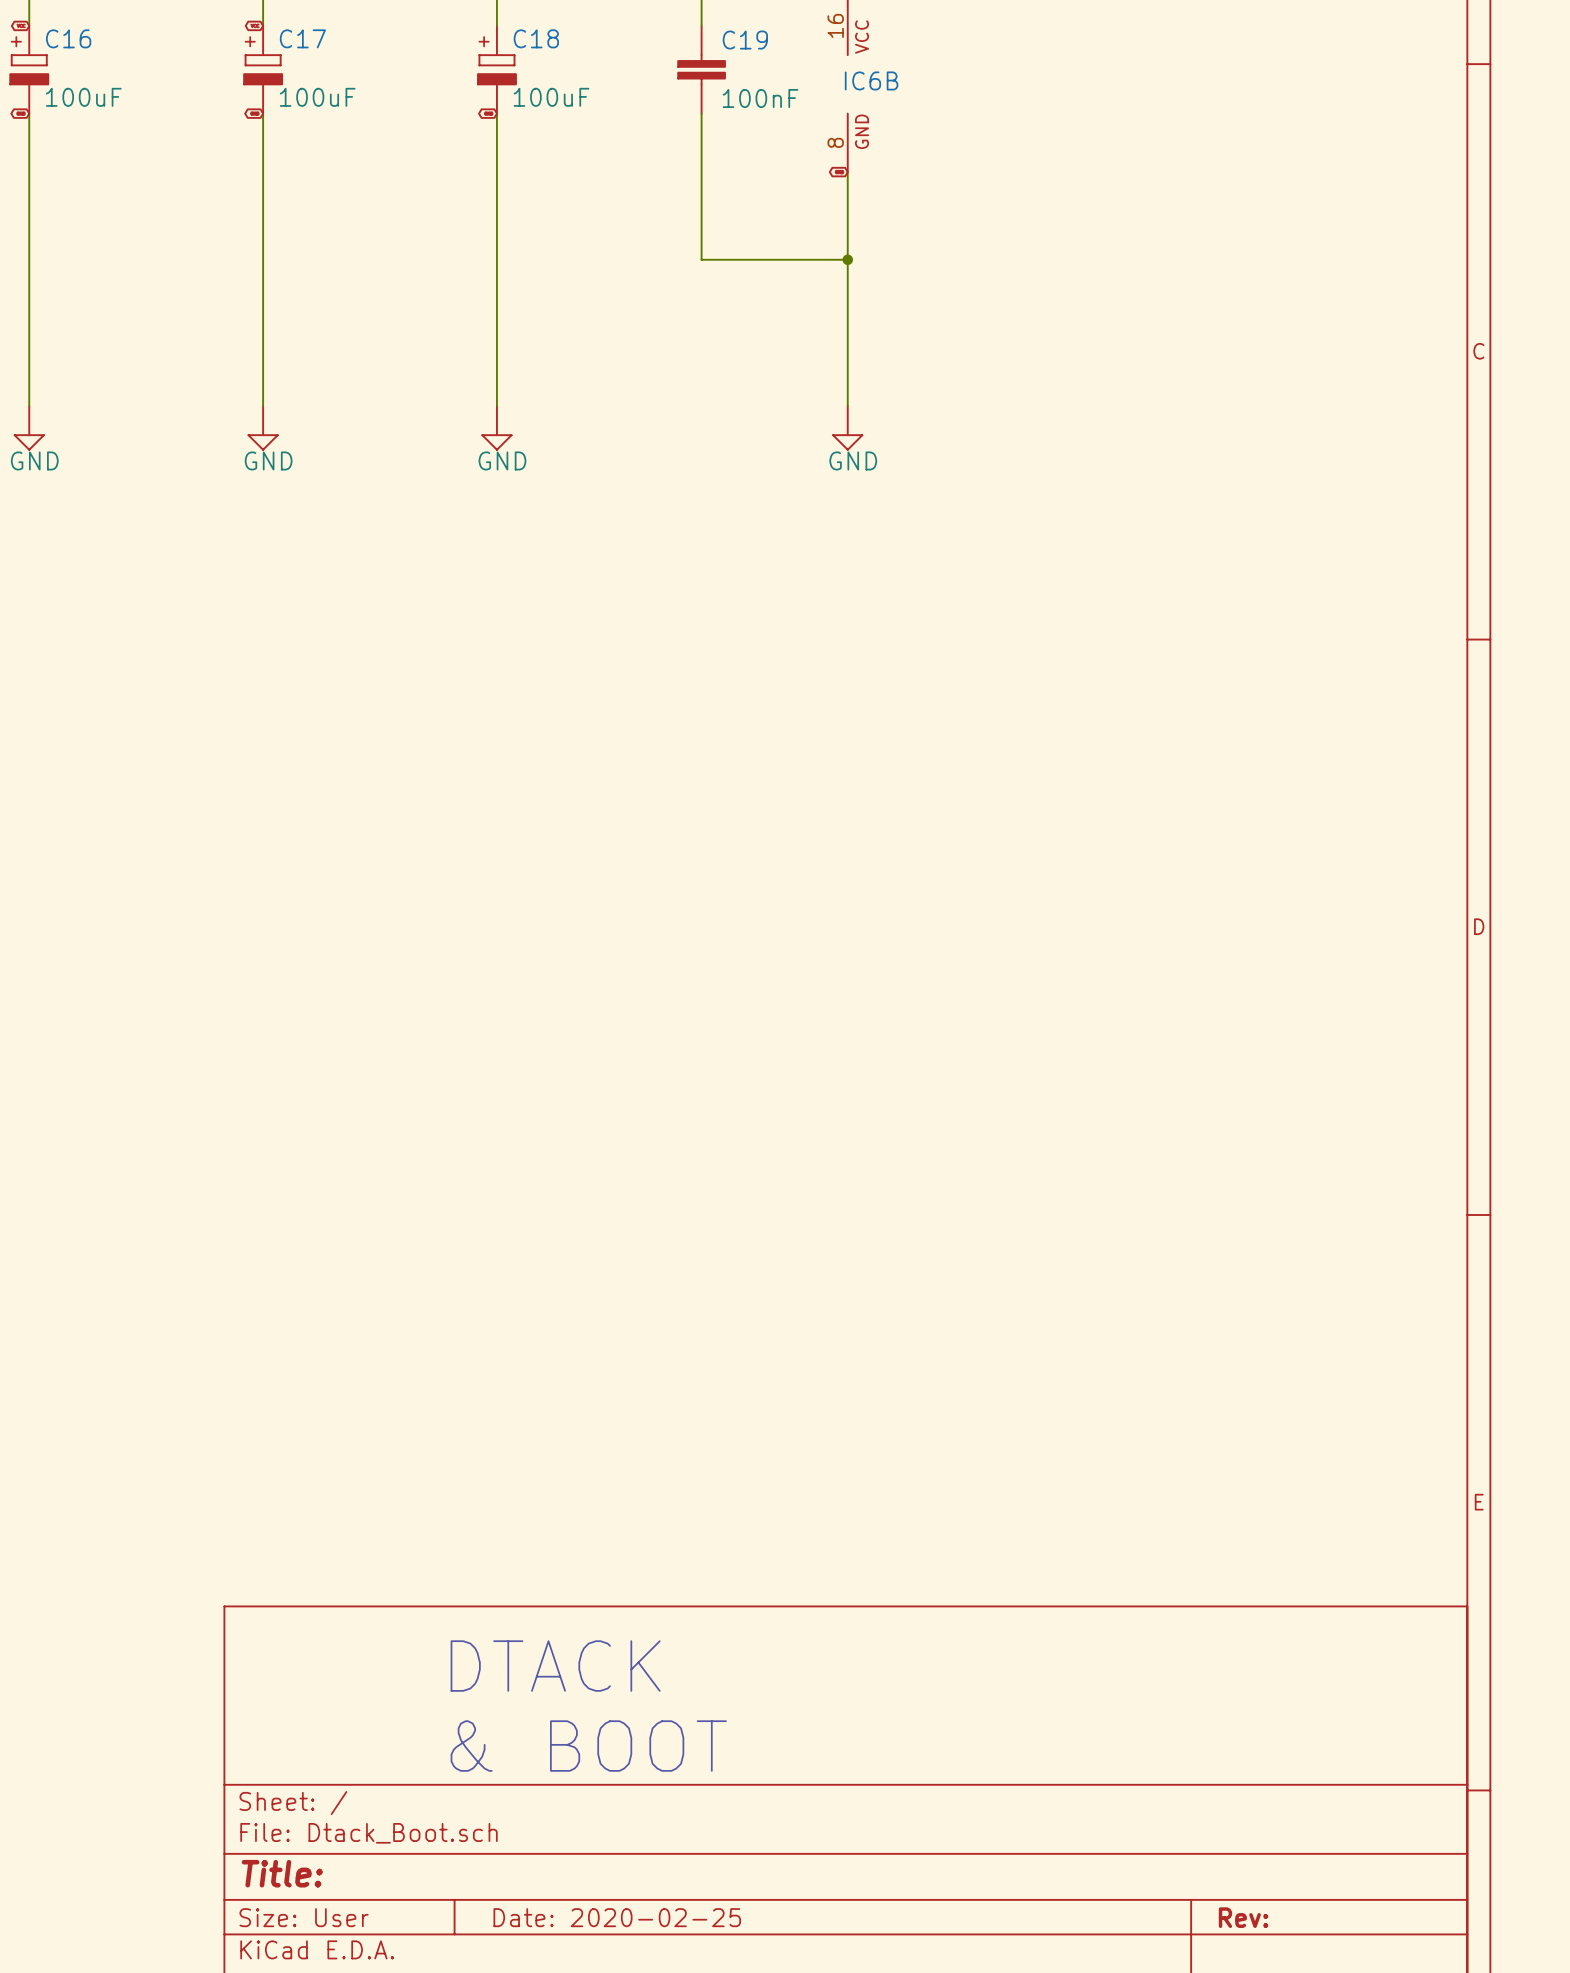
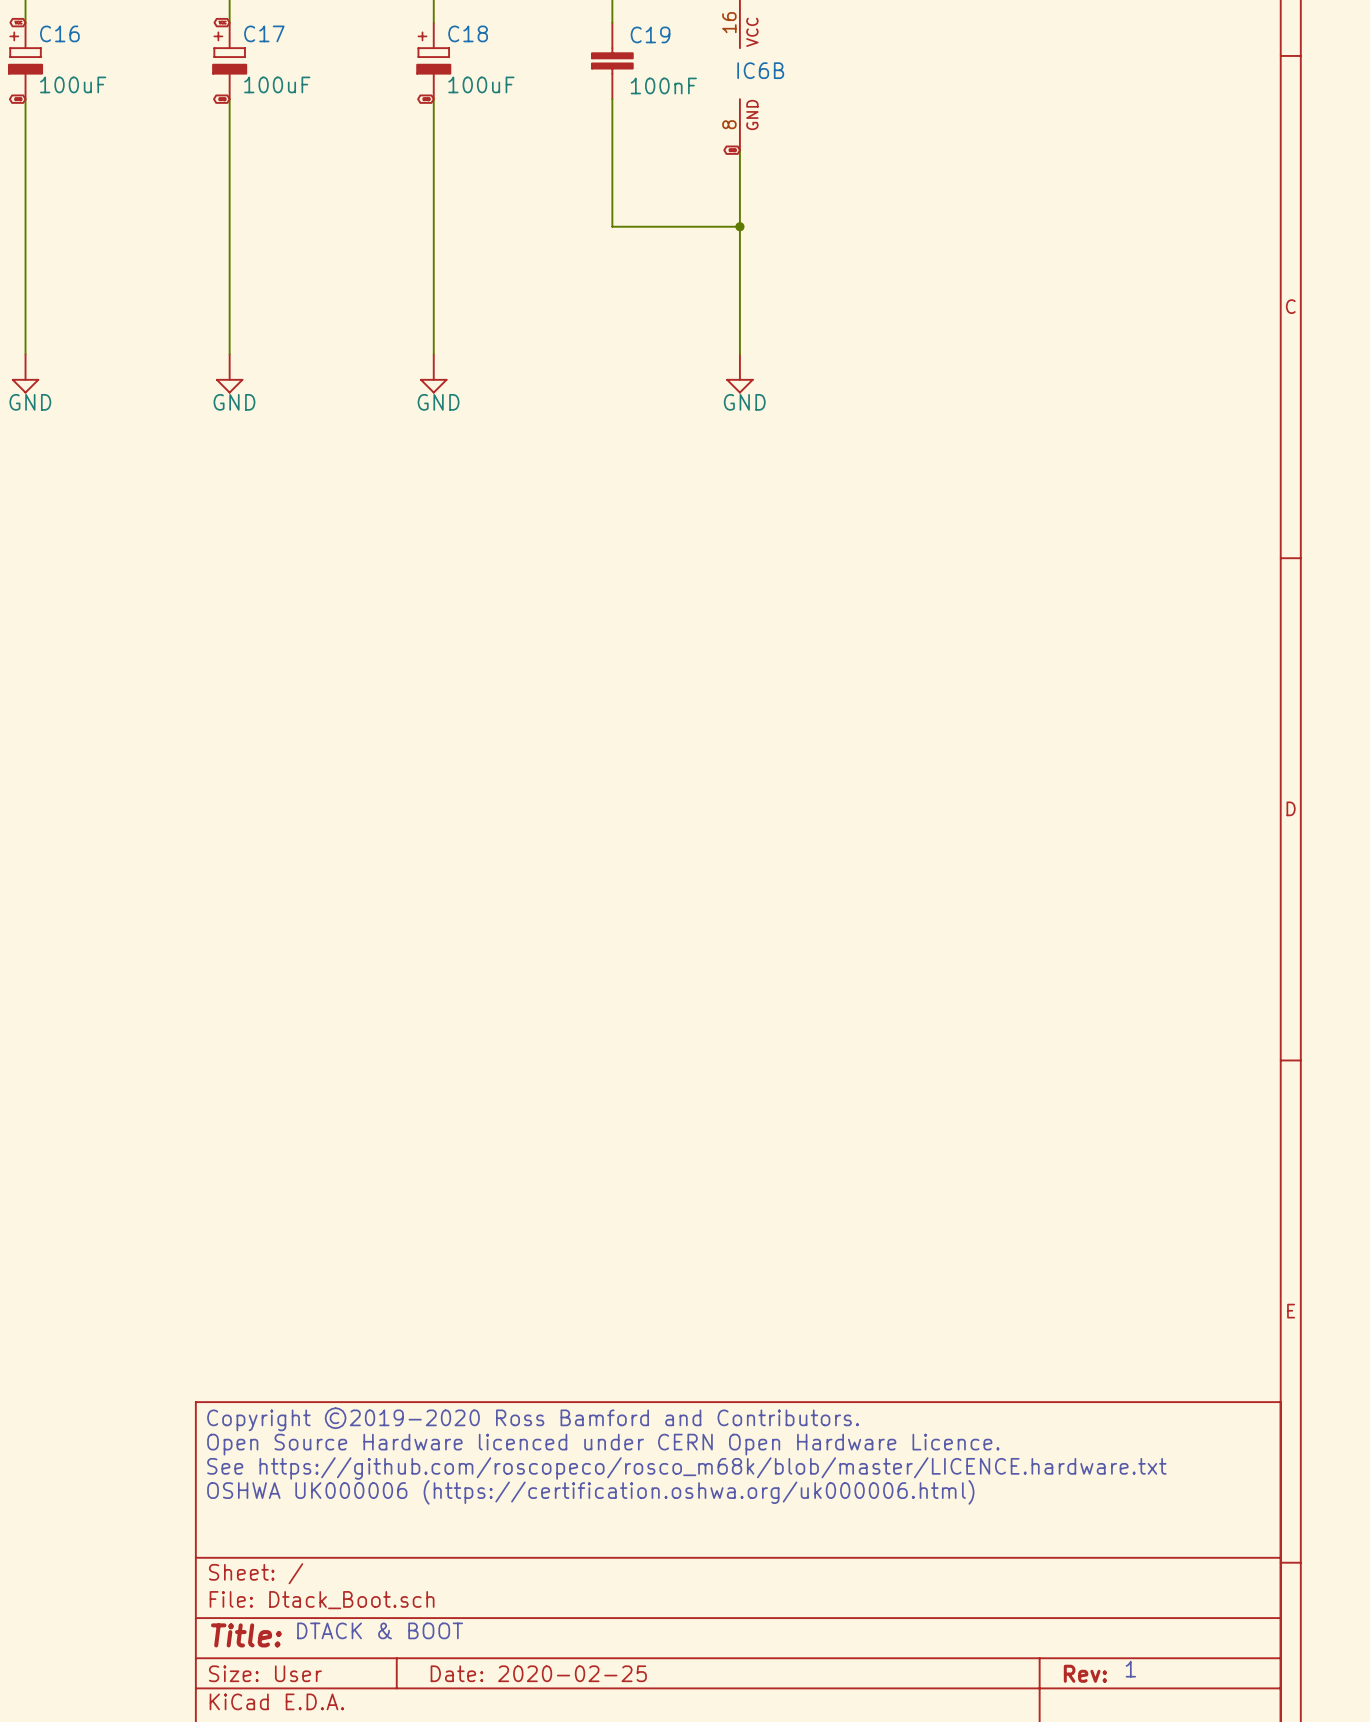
text: none -> Copyright ©2019-2020 Ross Bamford and Contributors. (533, 1419)
text: none -> Open Source Hardware licenced under CERN Open Hardware Licence. (603, 1444)
text: DTACK (555, 1666) -> none
text: none -> See https://github.com/roscopeco/rosco_m68k/blob/master/LICENCE.hardware.txt (686, 1468)
text: none -> OSHWA UK000006 (https://certification.oshwa.org/uk000006.html) (590, 1492)
text: & BOOT (588, 1746) -> none
text: none -> DTACK & BOOT (380, 1630)
text: none -> 1 (1130, 1669)

